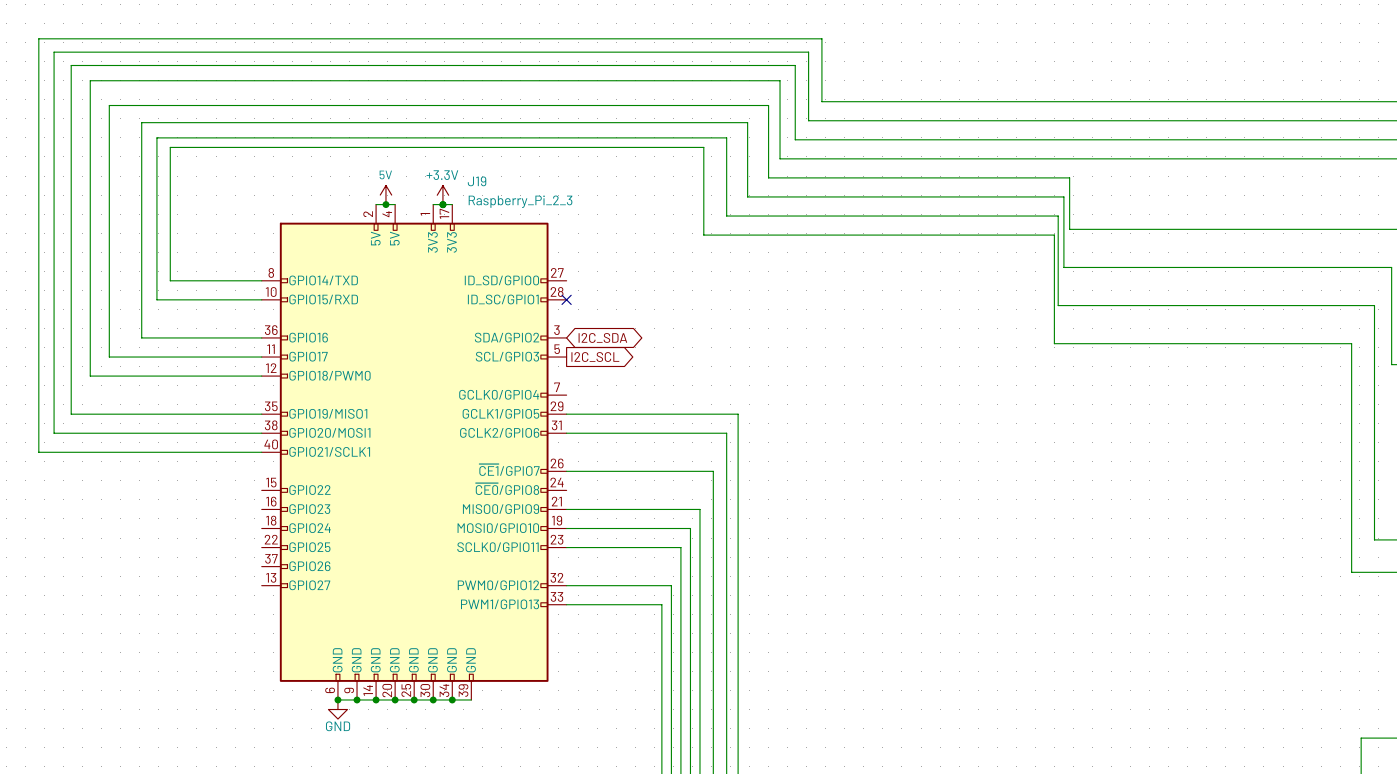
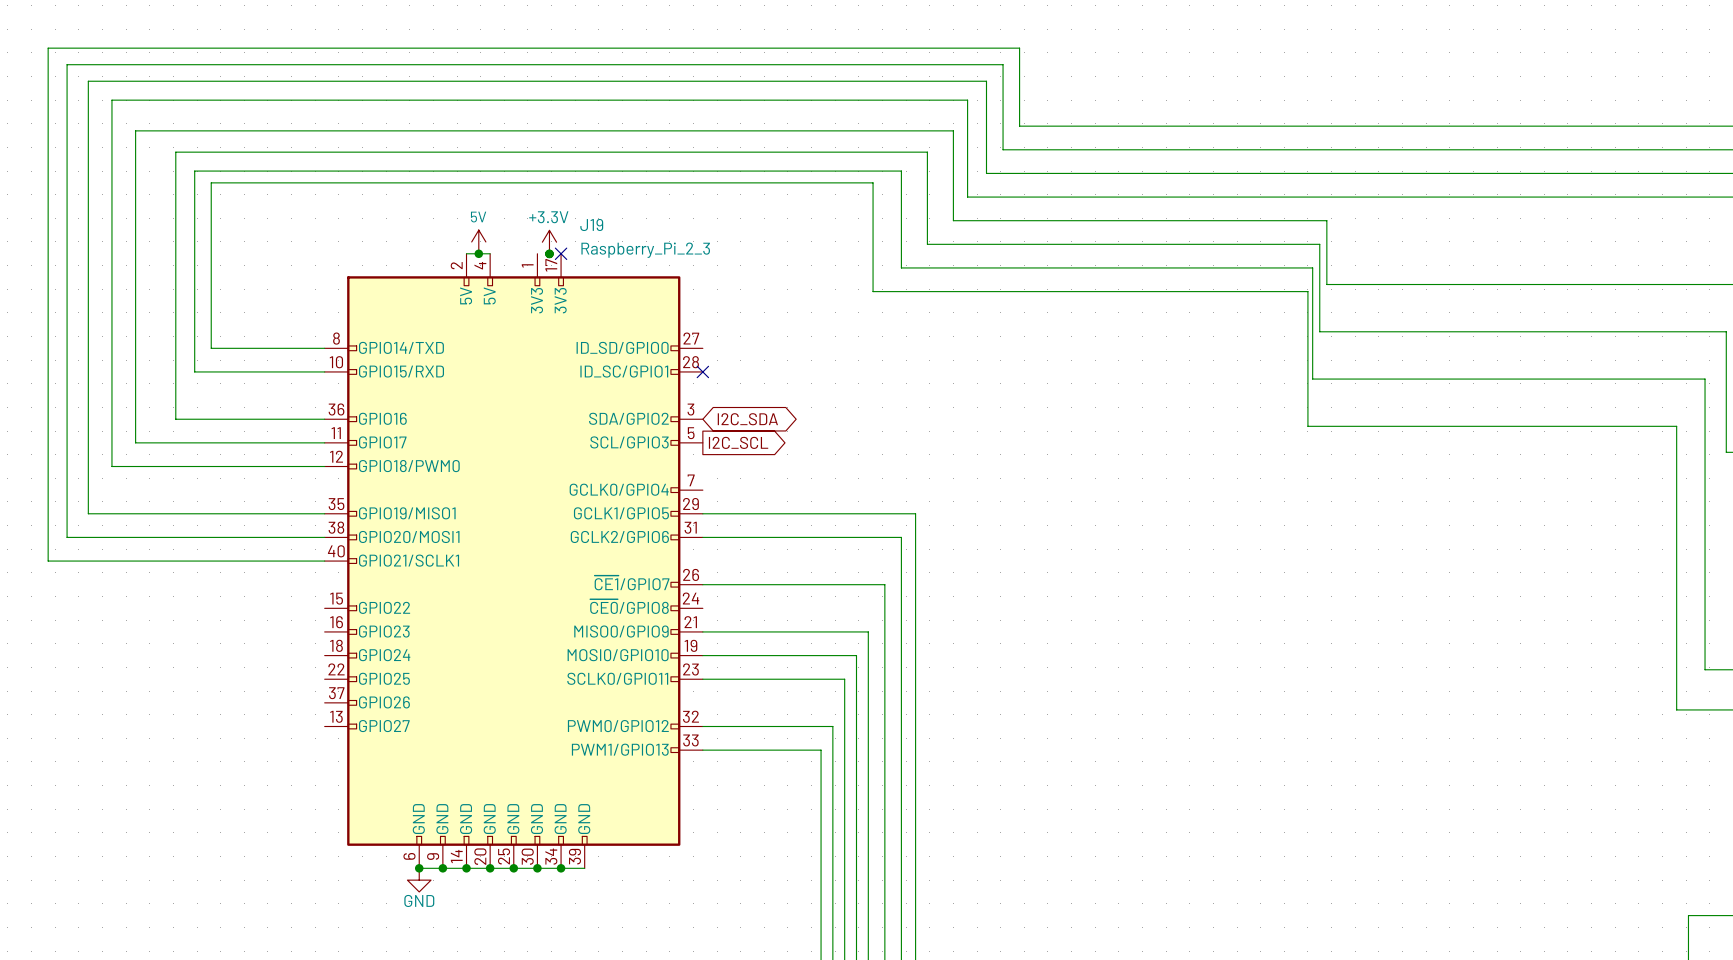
wire: (433, 204) (452, 204) -> none
no-connect mark: none -> (561, 253)

